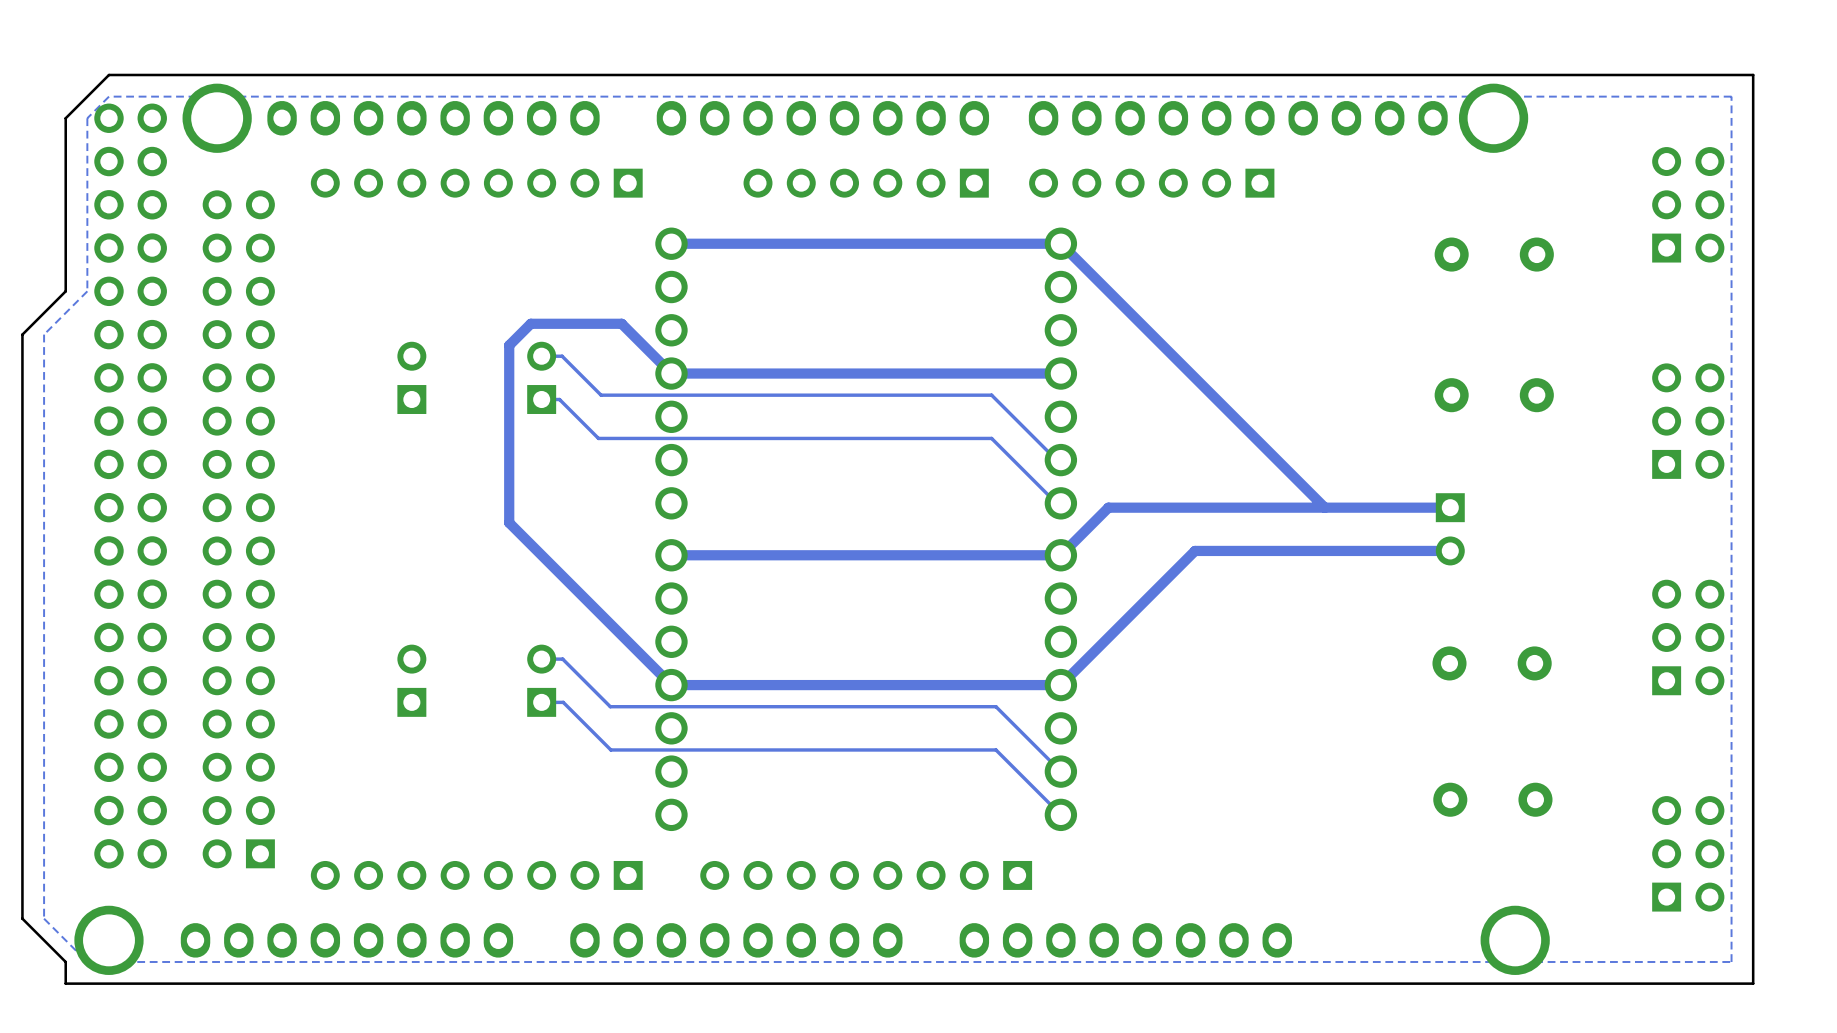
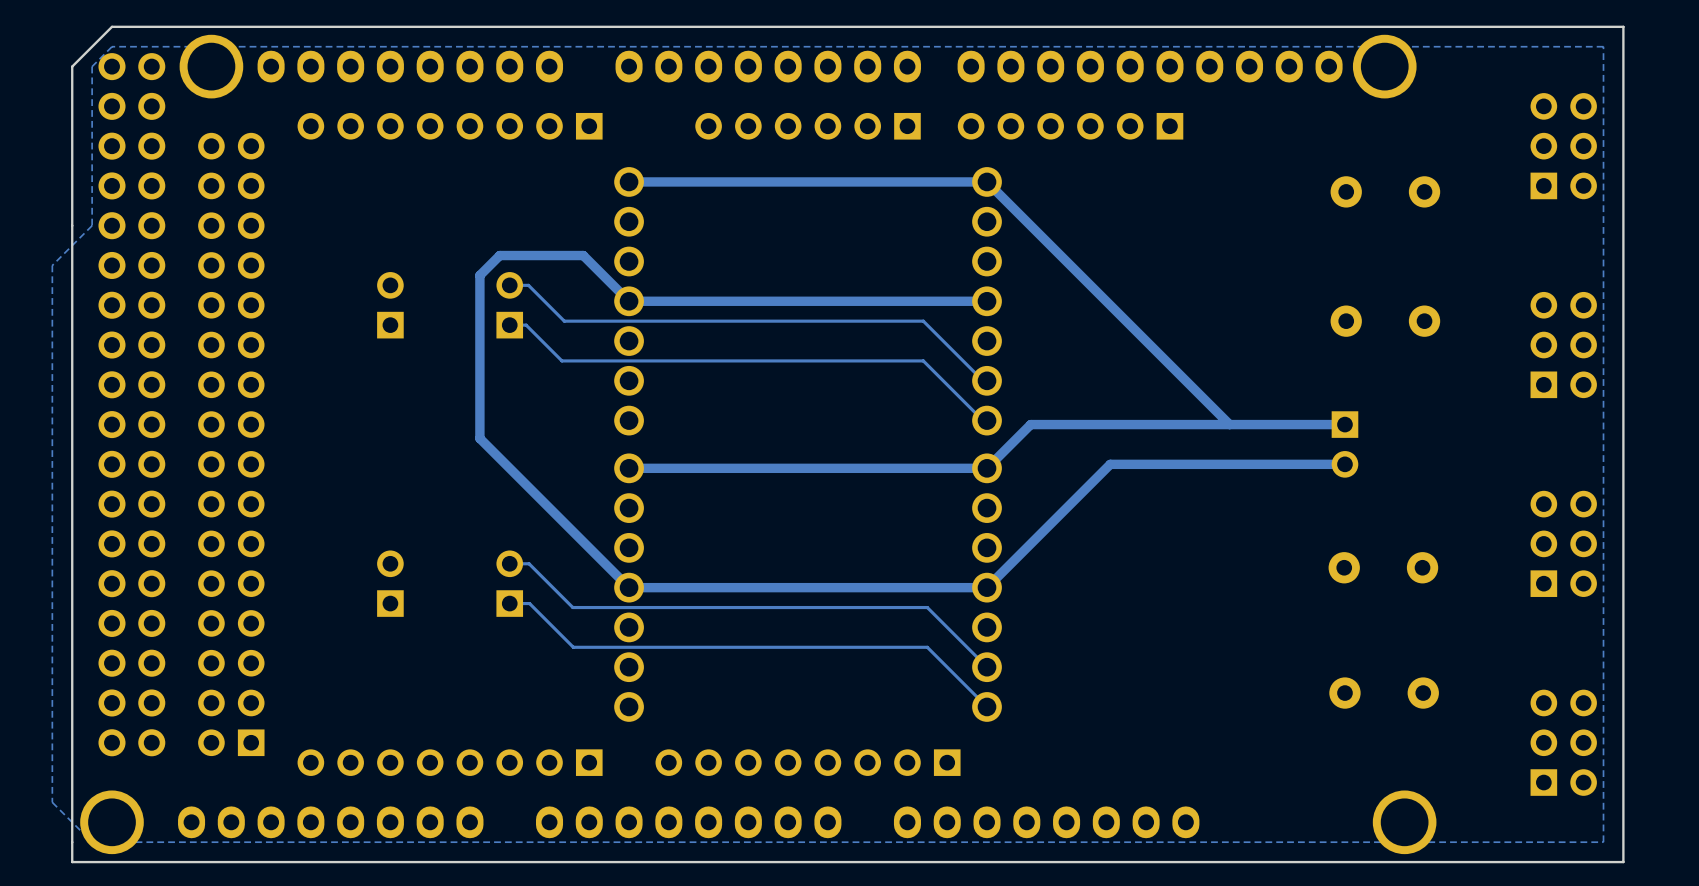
board edge: (65, 291) (22, 334) (22, 918) (65, 961) -> (72, 225) (72, 842)

